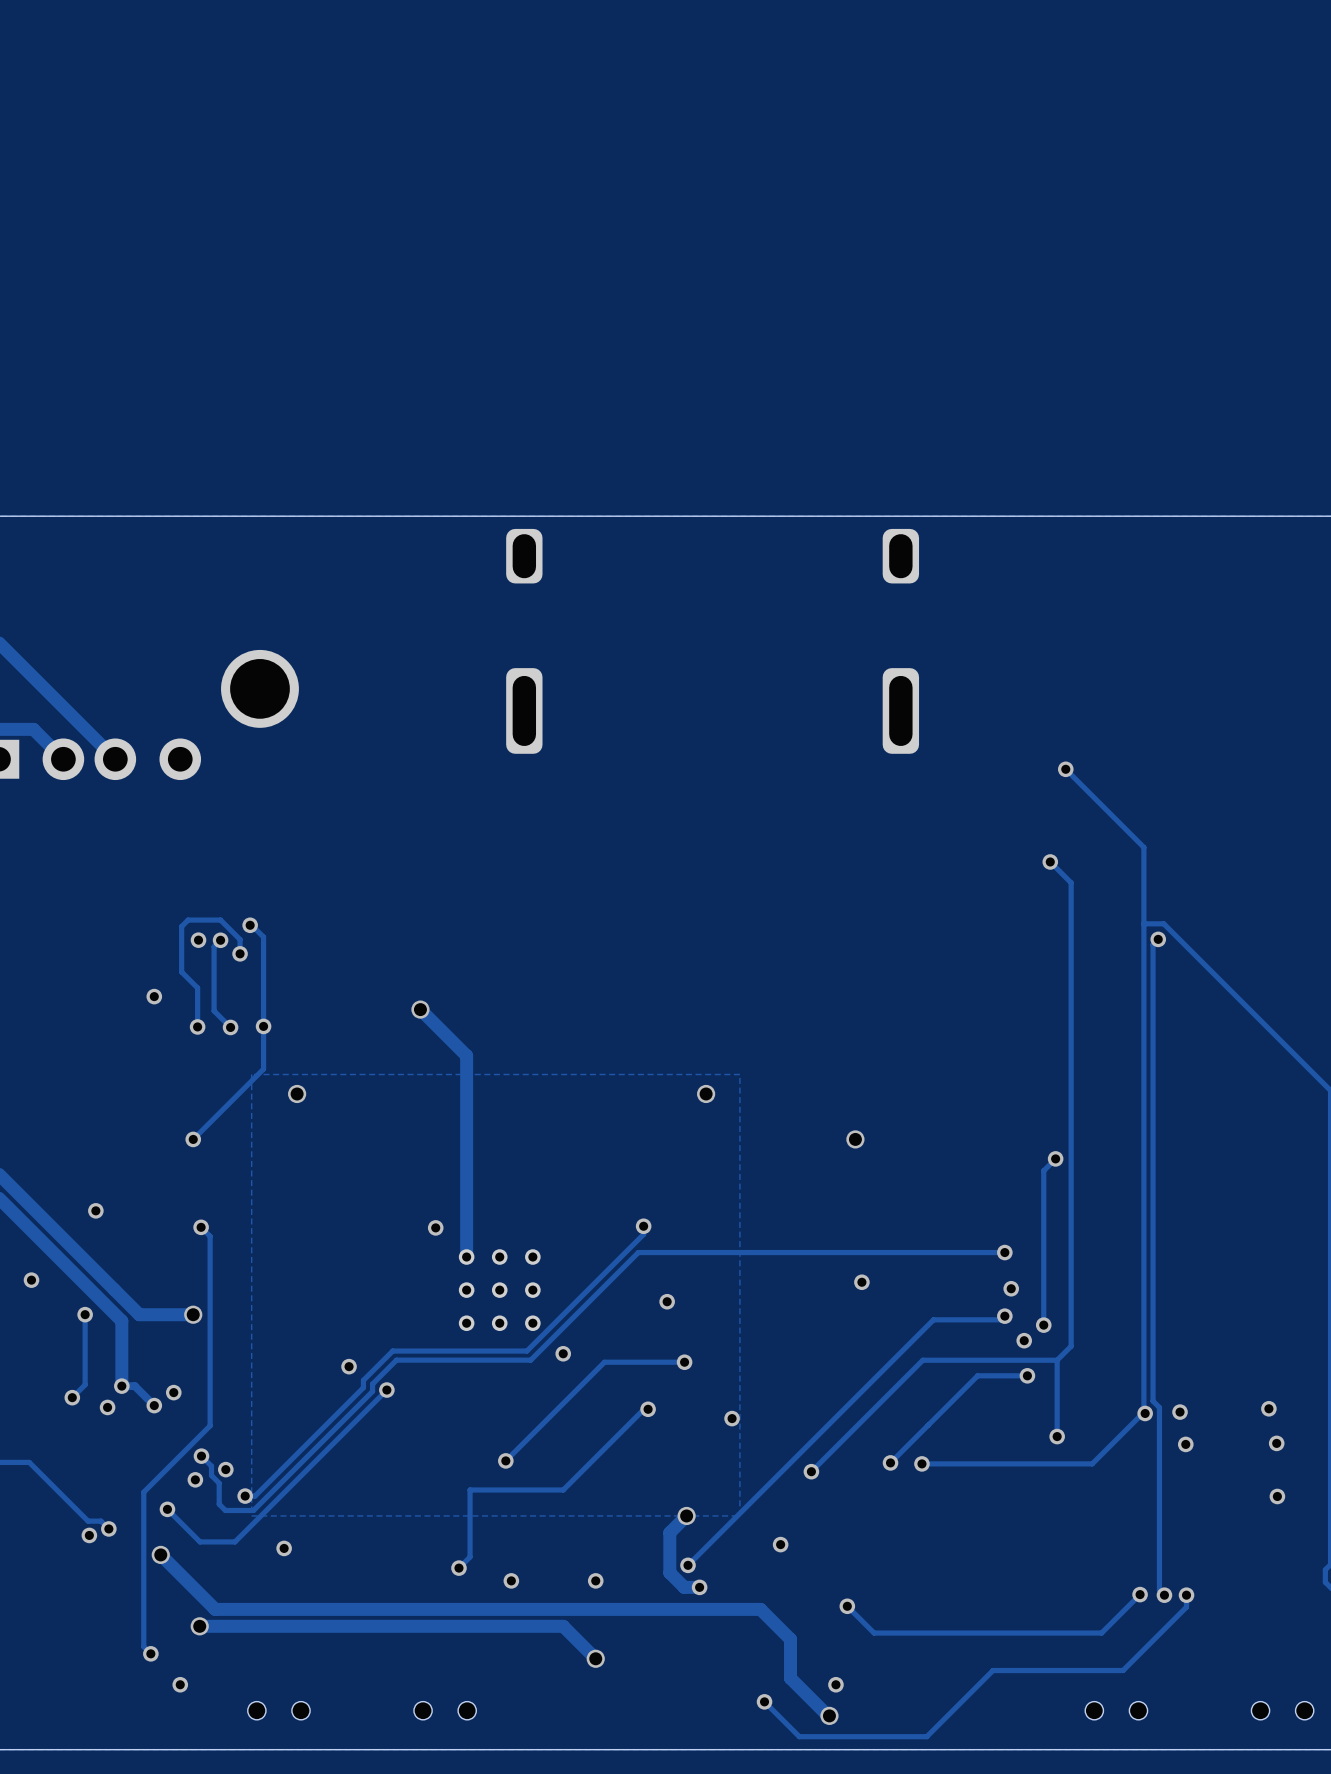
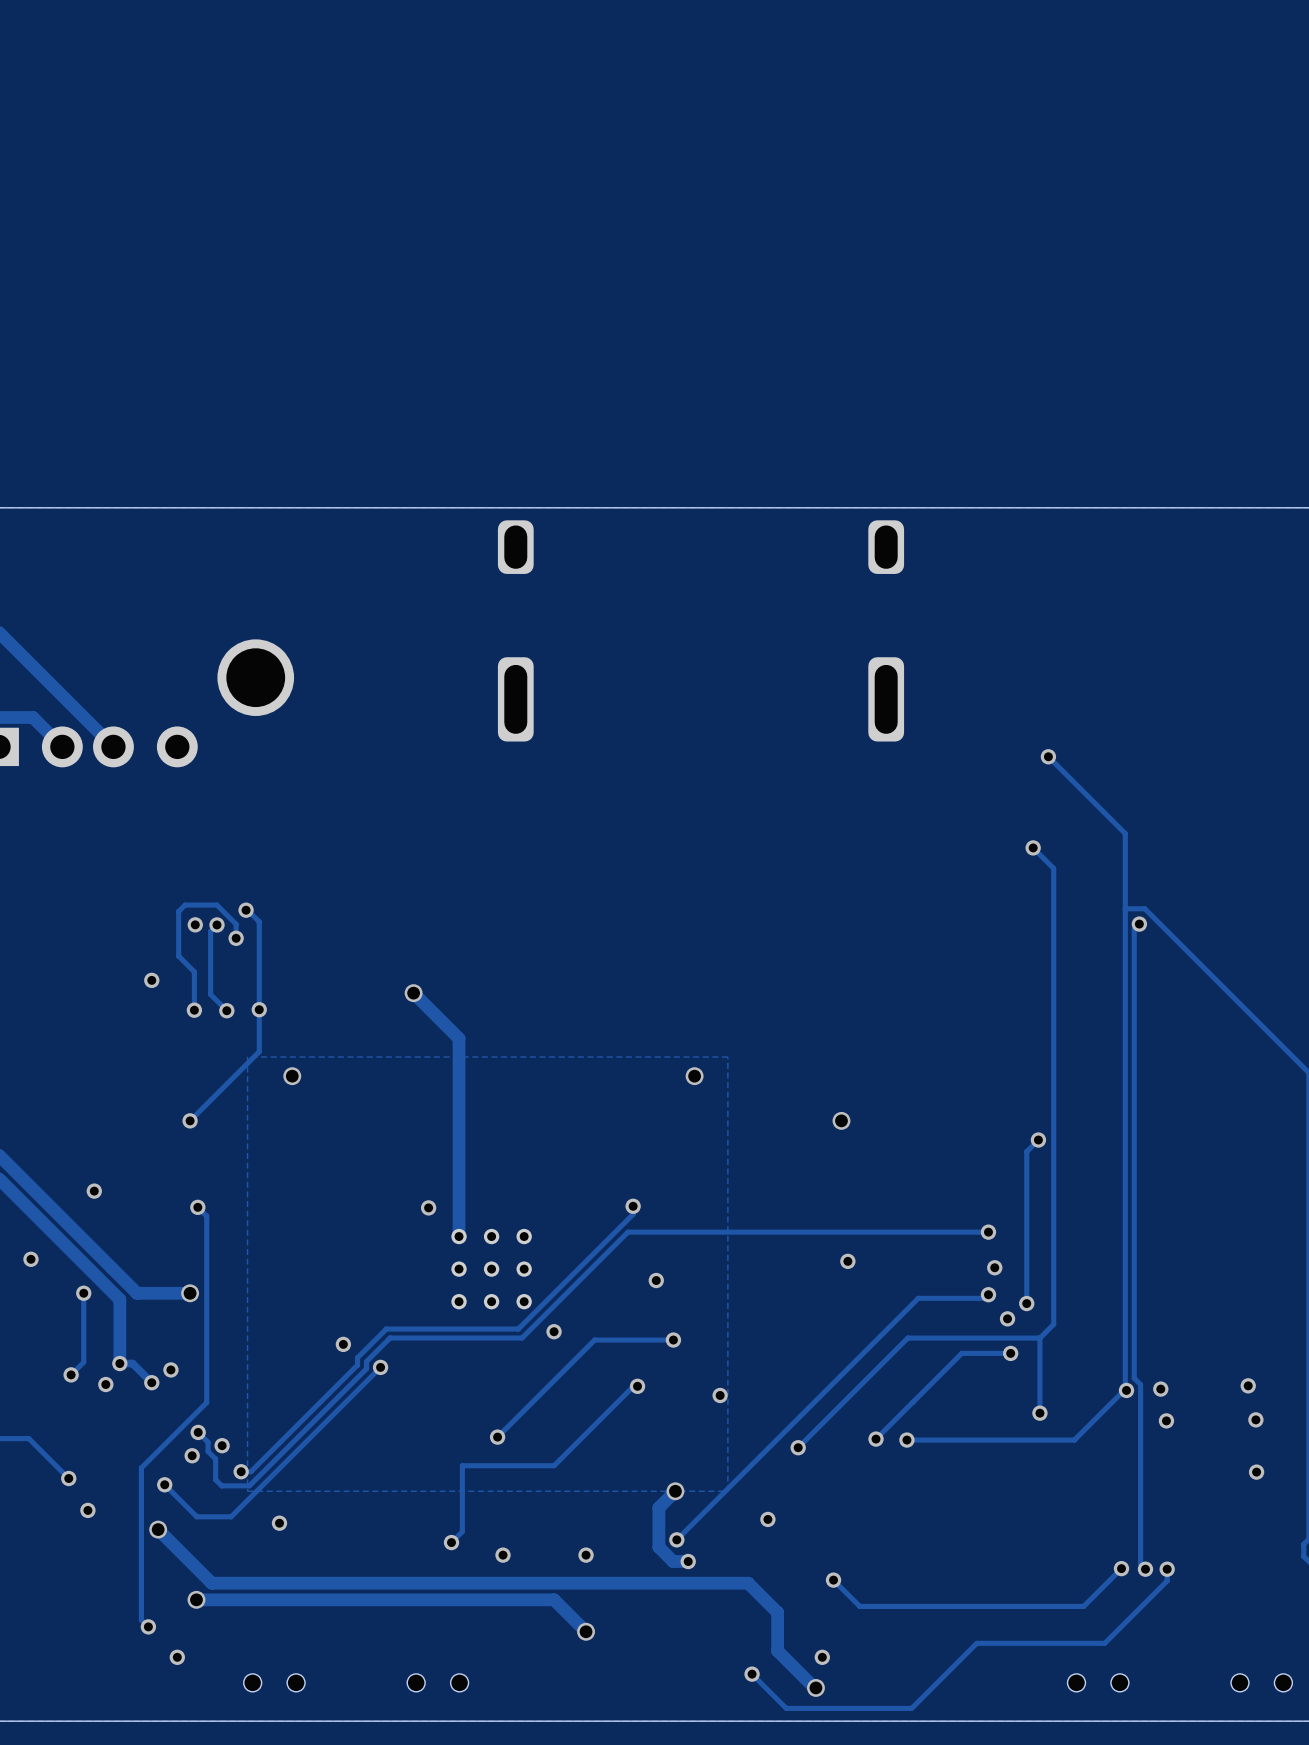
track: (69, 1502) (88, 1521) (101, 1521) (108, 1528) -> none
via position: (108, 1528) -> (68, 1478)

